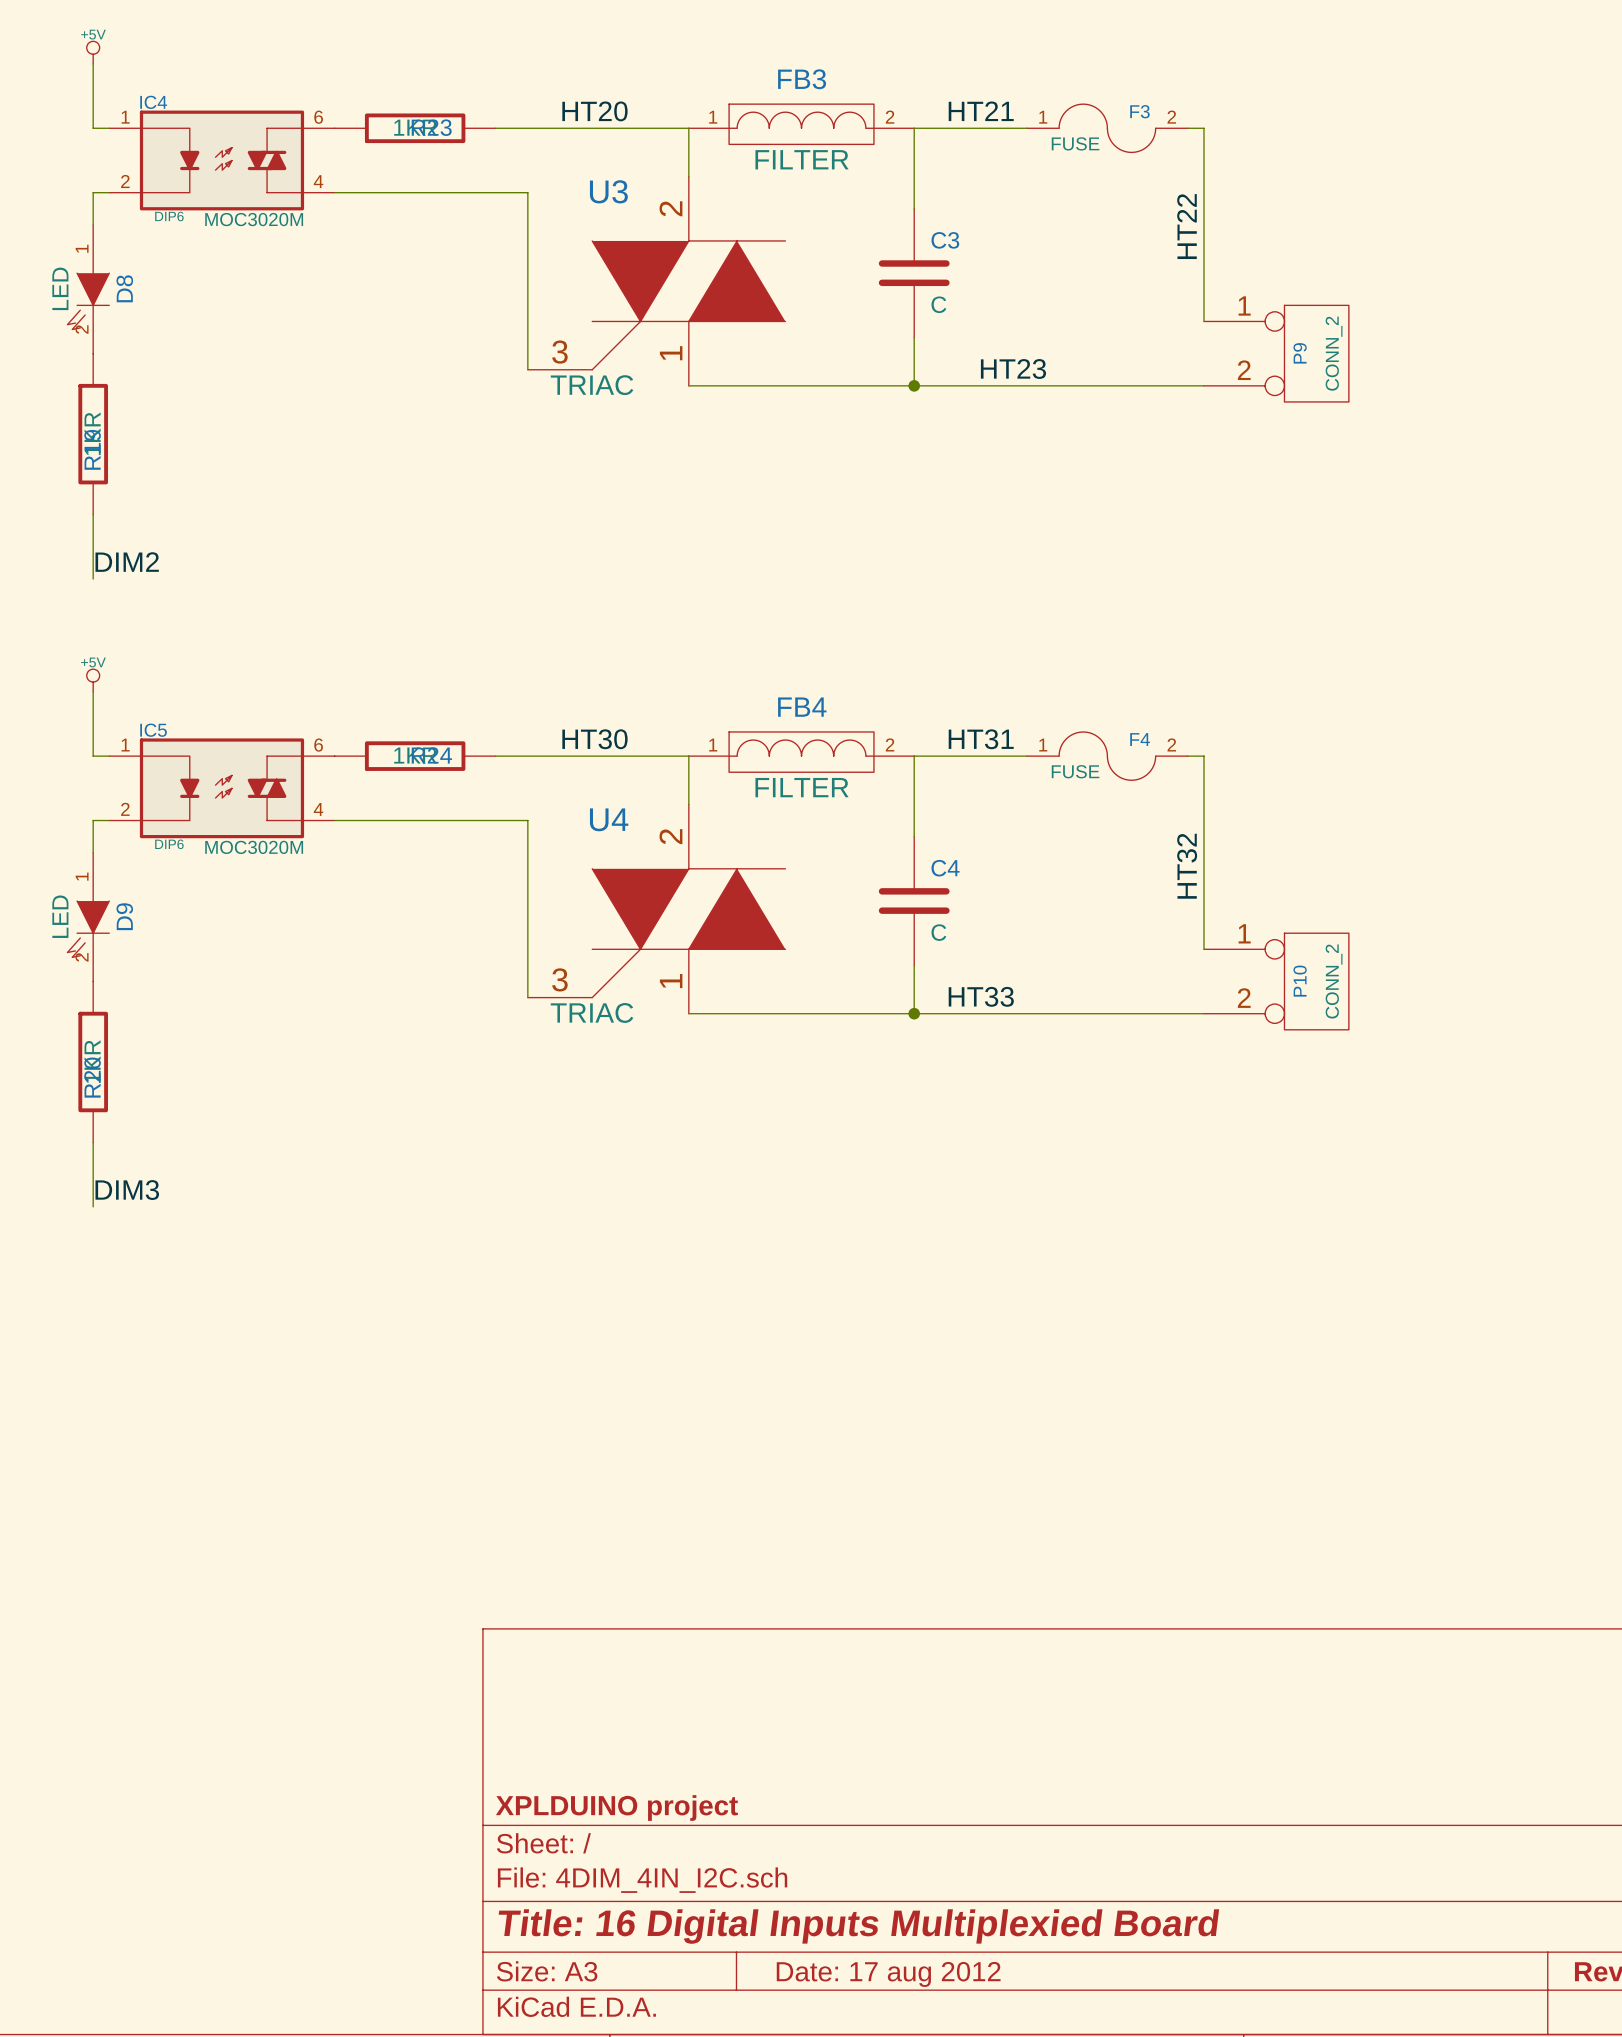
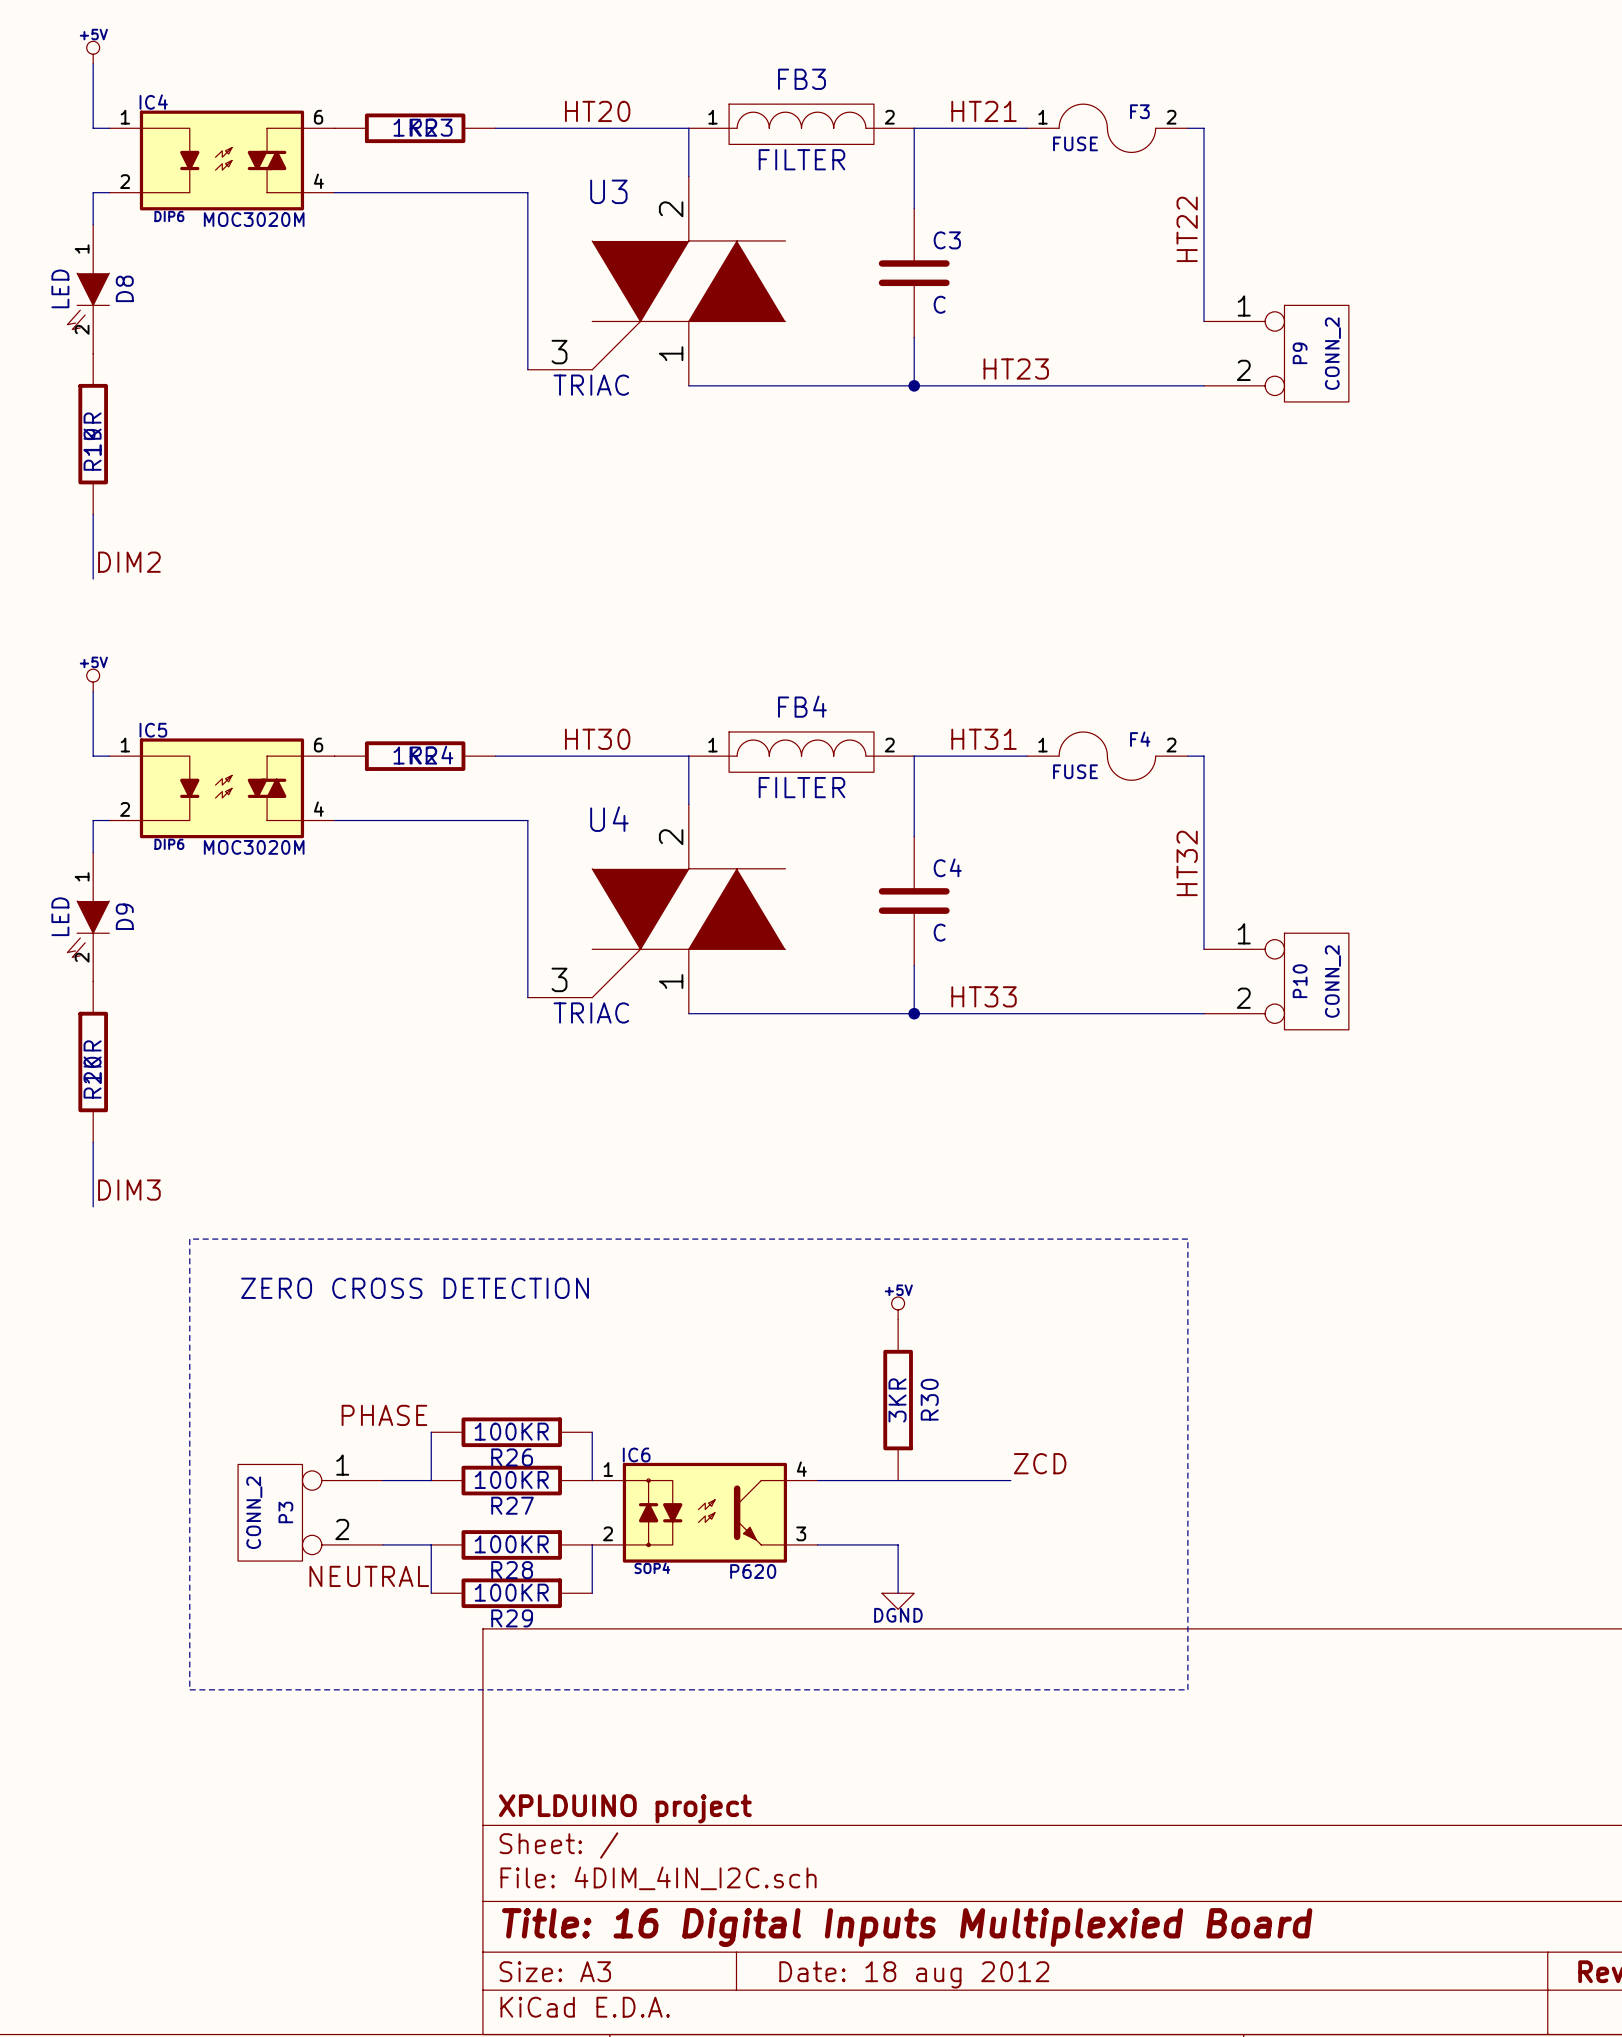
line: none -> (189, 1239) (189, 1689) (1187, 1689) (1187, 1239) (189, 1239)
text: none -> ZERO CROSS DETECTION (415, 1288)
power symbol: none -> +5V (898, 1308)
R30: none -> 3KR (898, 1400)
label: none -> PHASE (384, 1415)
wire: none -> (431, 1432) (431, 1480) (382, 1480)
R26: none -> 100KR (511, 1432)
wire: none -> (592, 1432) (592, 1480)
label: none -> ZCD (1040, 1463)
R27: none -> 100KR (511, 1480)
wire: none -> (817, 1480) (1010, 1480)
P3: none -> CONN_2 (310, 1512)
IC6: none -> P620 (704, 1512)
wire: none -> (382, 1544) (431, 1544) (431, 1593)
R28: none -> 100KR (511, 1544)
wire: none -> (592, 1544) (592, 1593)
wire: none -> (817, 1544) (898, 1544) (898, 1593)
label: none -> NEUTRAL (369, 1576)
R29: none -> 100KR (511, 1593)
power symbol: none -> DGND (898, 1601)
title block: Date: 17 aug 2012 (888, 1974) -> Date: 18 aug 2012 (914, 1974)

